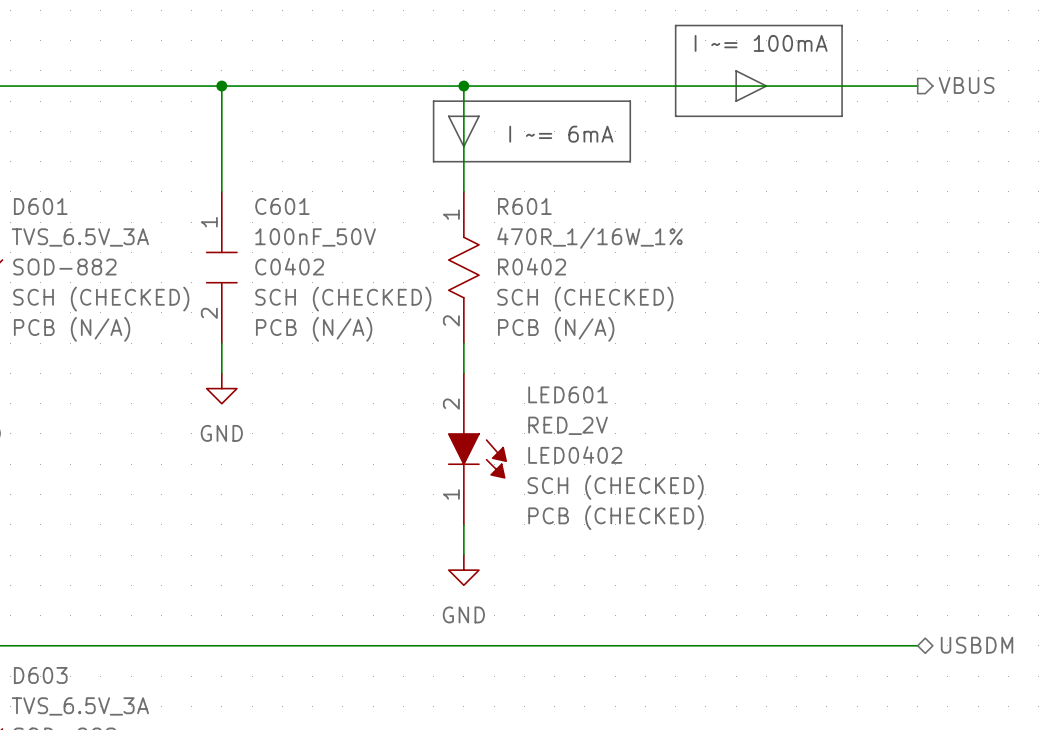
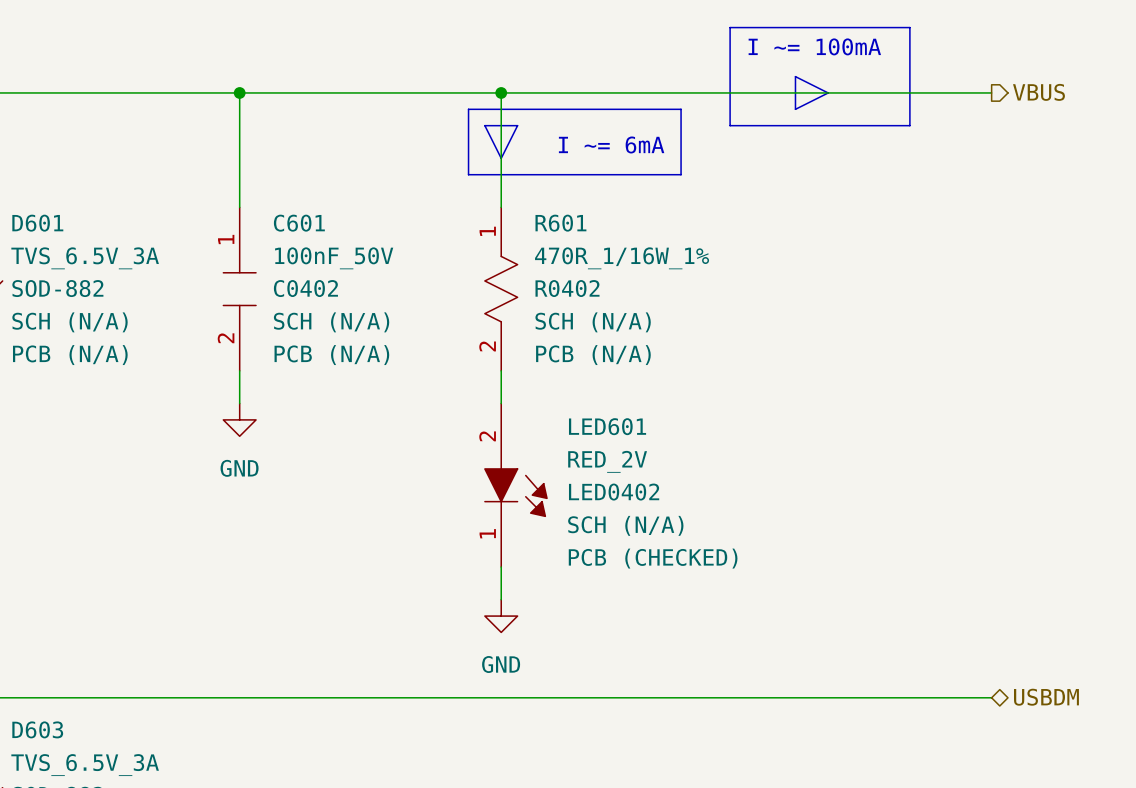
D601 text: SCH (CHECKED) (101, 299) -> SCH (N/A) (70, 322)
C601 text: SCH (CHECKED) (343, 299) -> SCH (N/A) (331, 322)
R601 text: SCH (CHECKED) (585, 299) -> SCH (N/A) (593, 322)
LED601 text: SCH (CHECKED) (615, 487) -> SCH (N/A) (625, 525)

